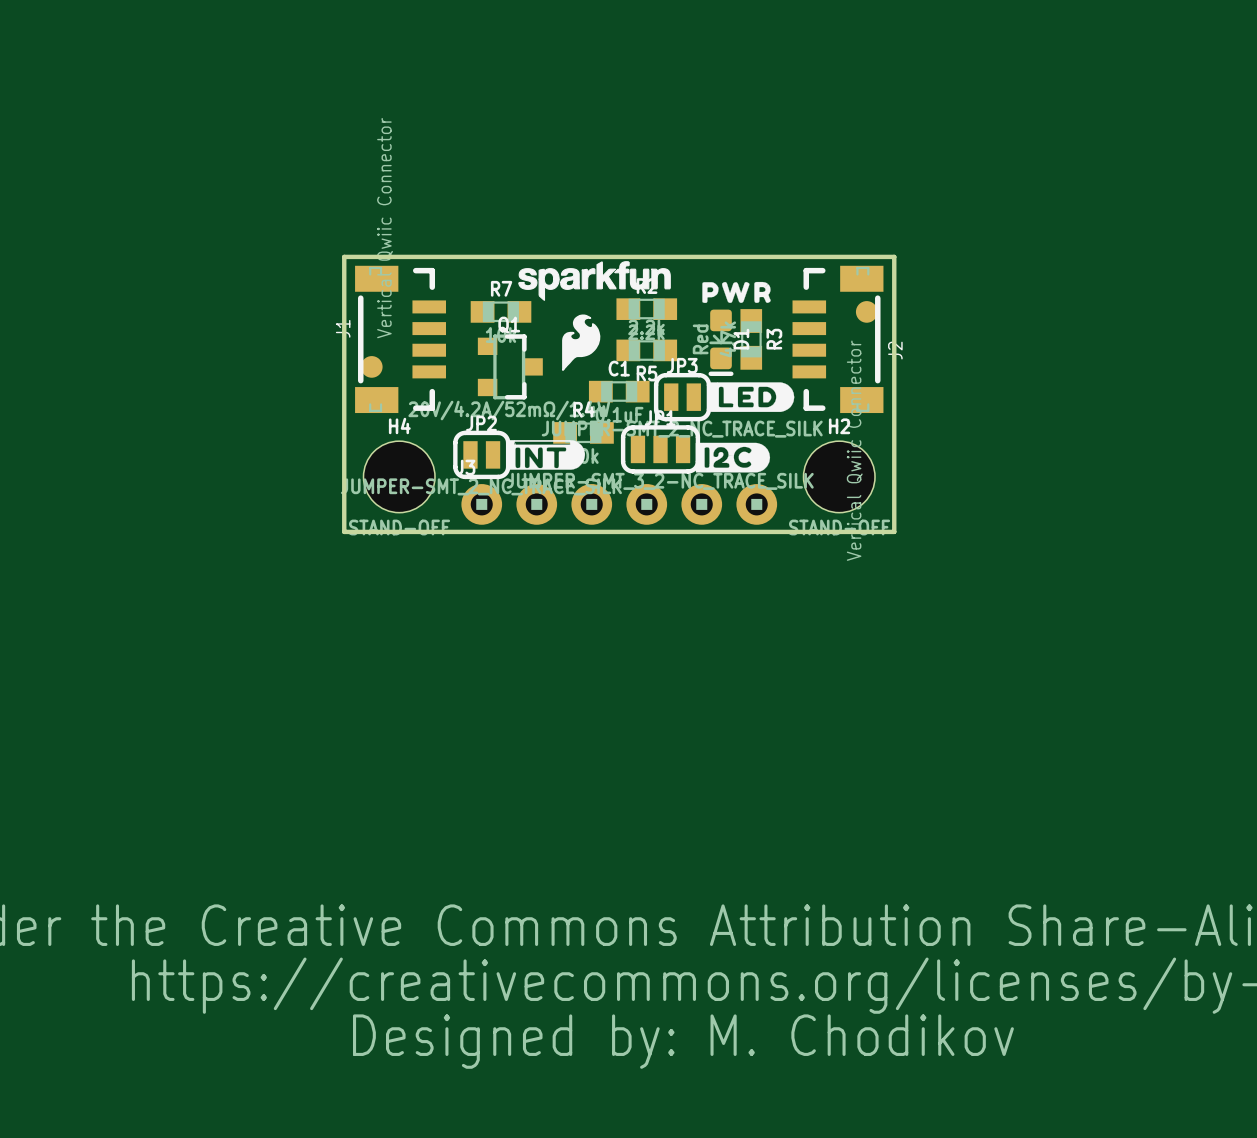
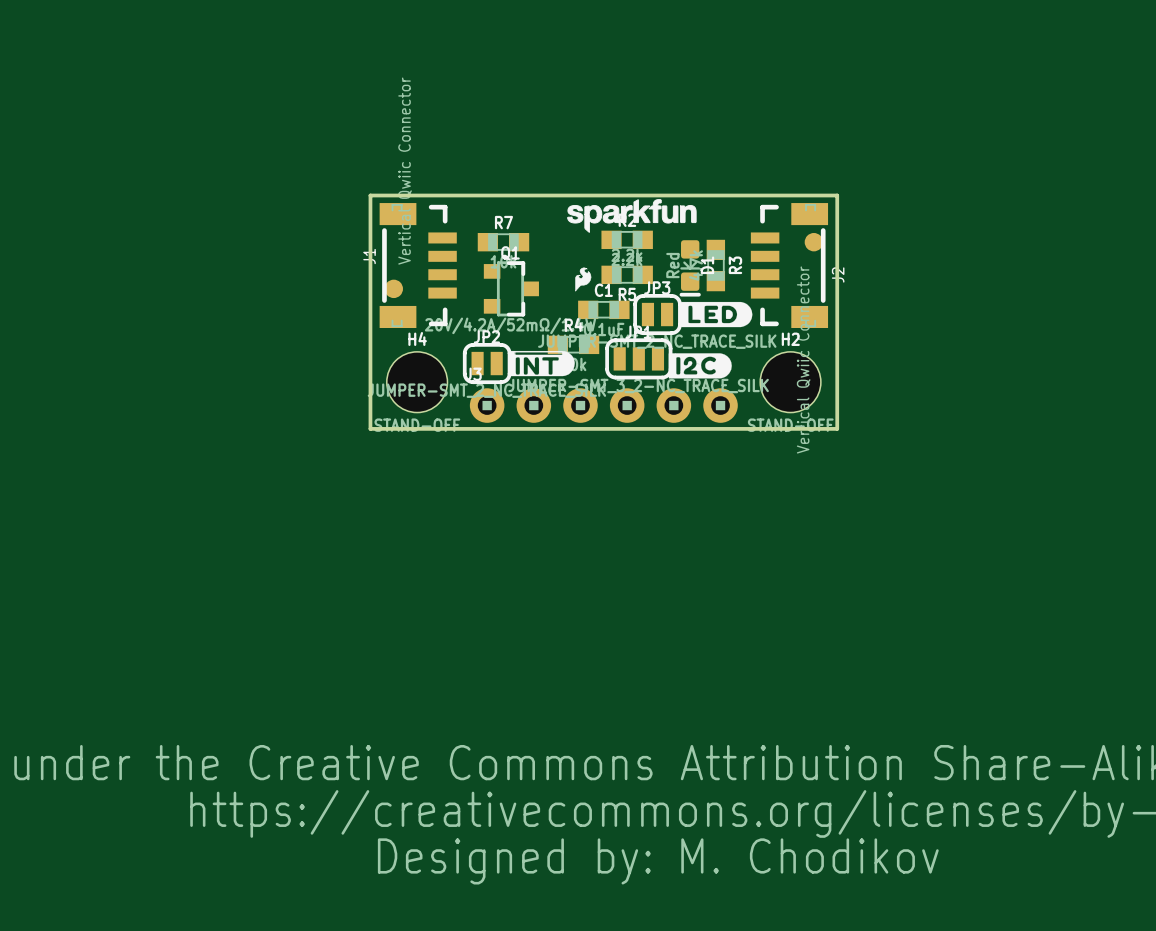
drawing position: (594, 280) -> (631, 215)
drawing: [702, 281, 771, 303] -> none
drawing shape: [562, 314, 601, 371] -> [575, 267, 592, 292]

